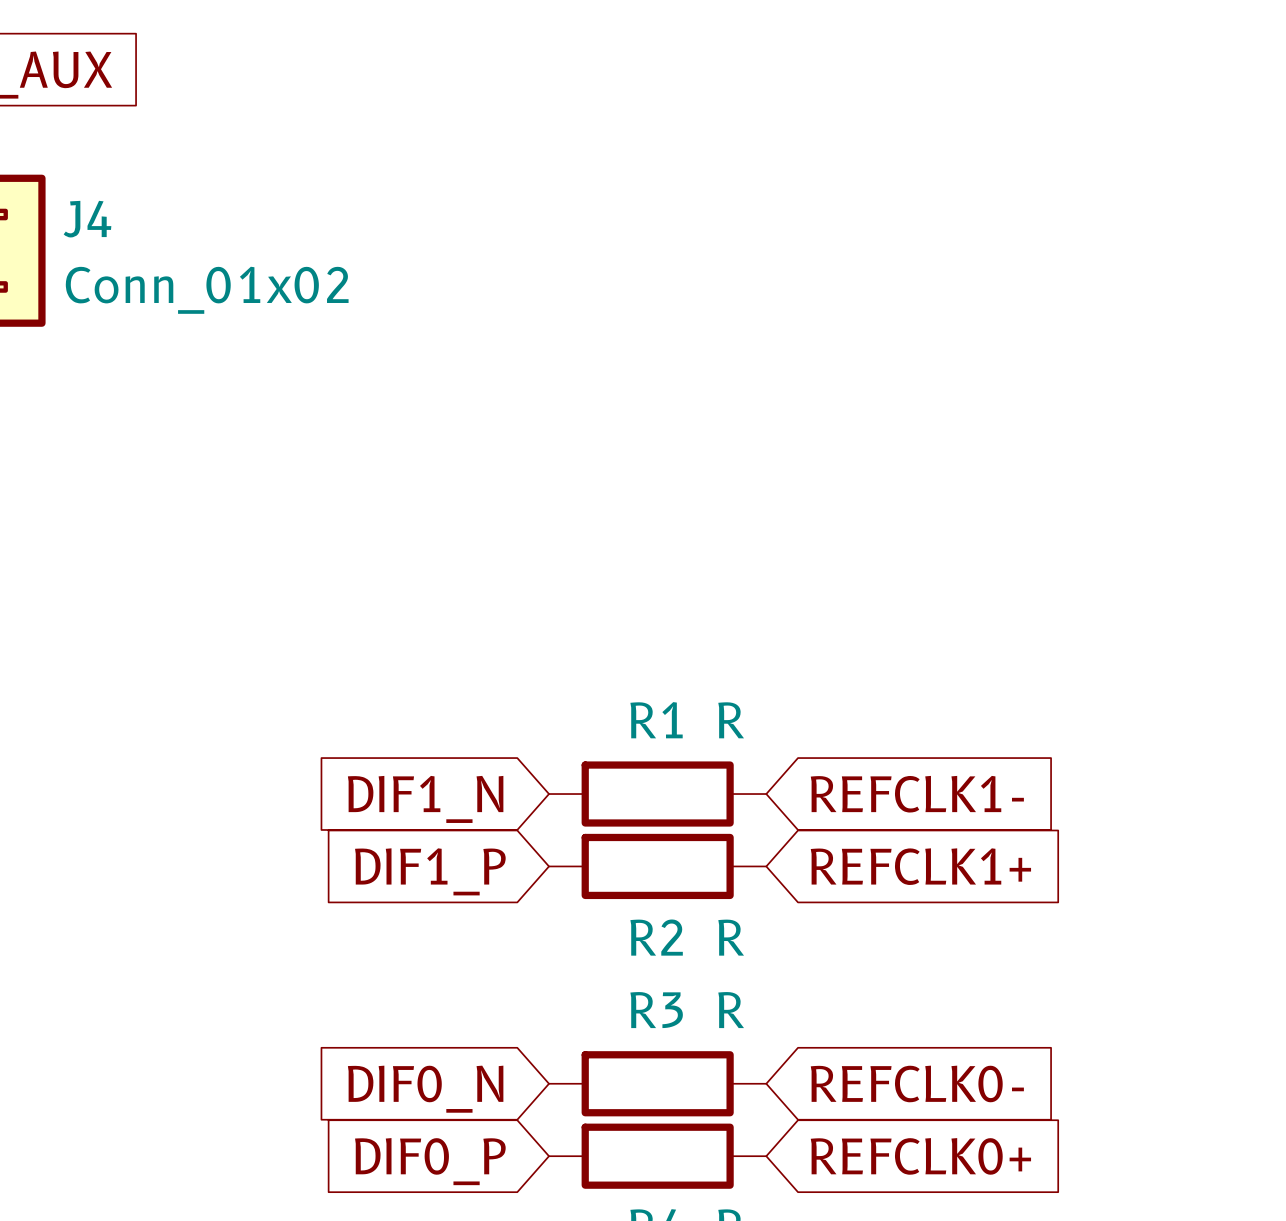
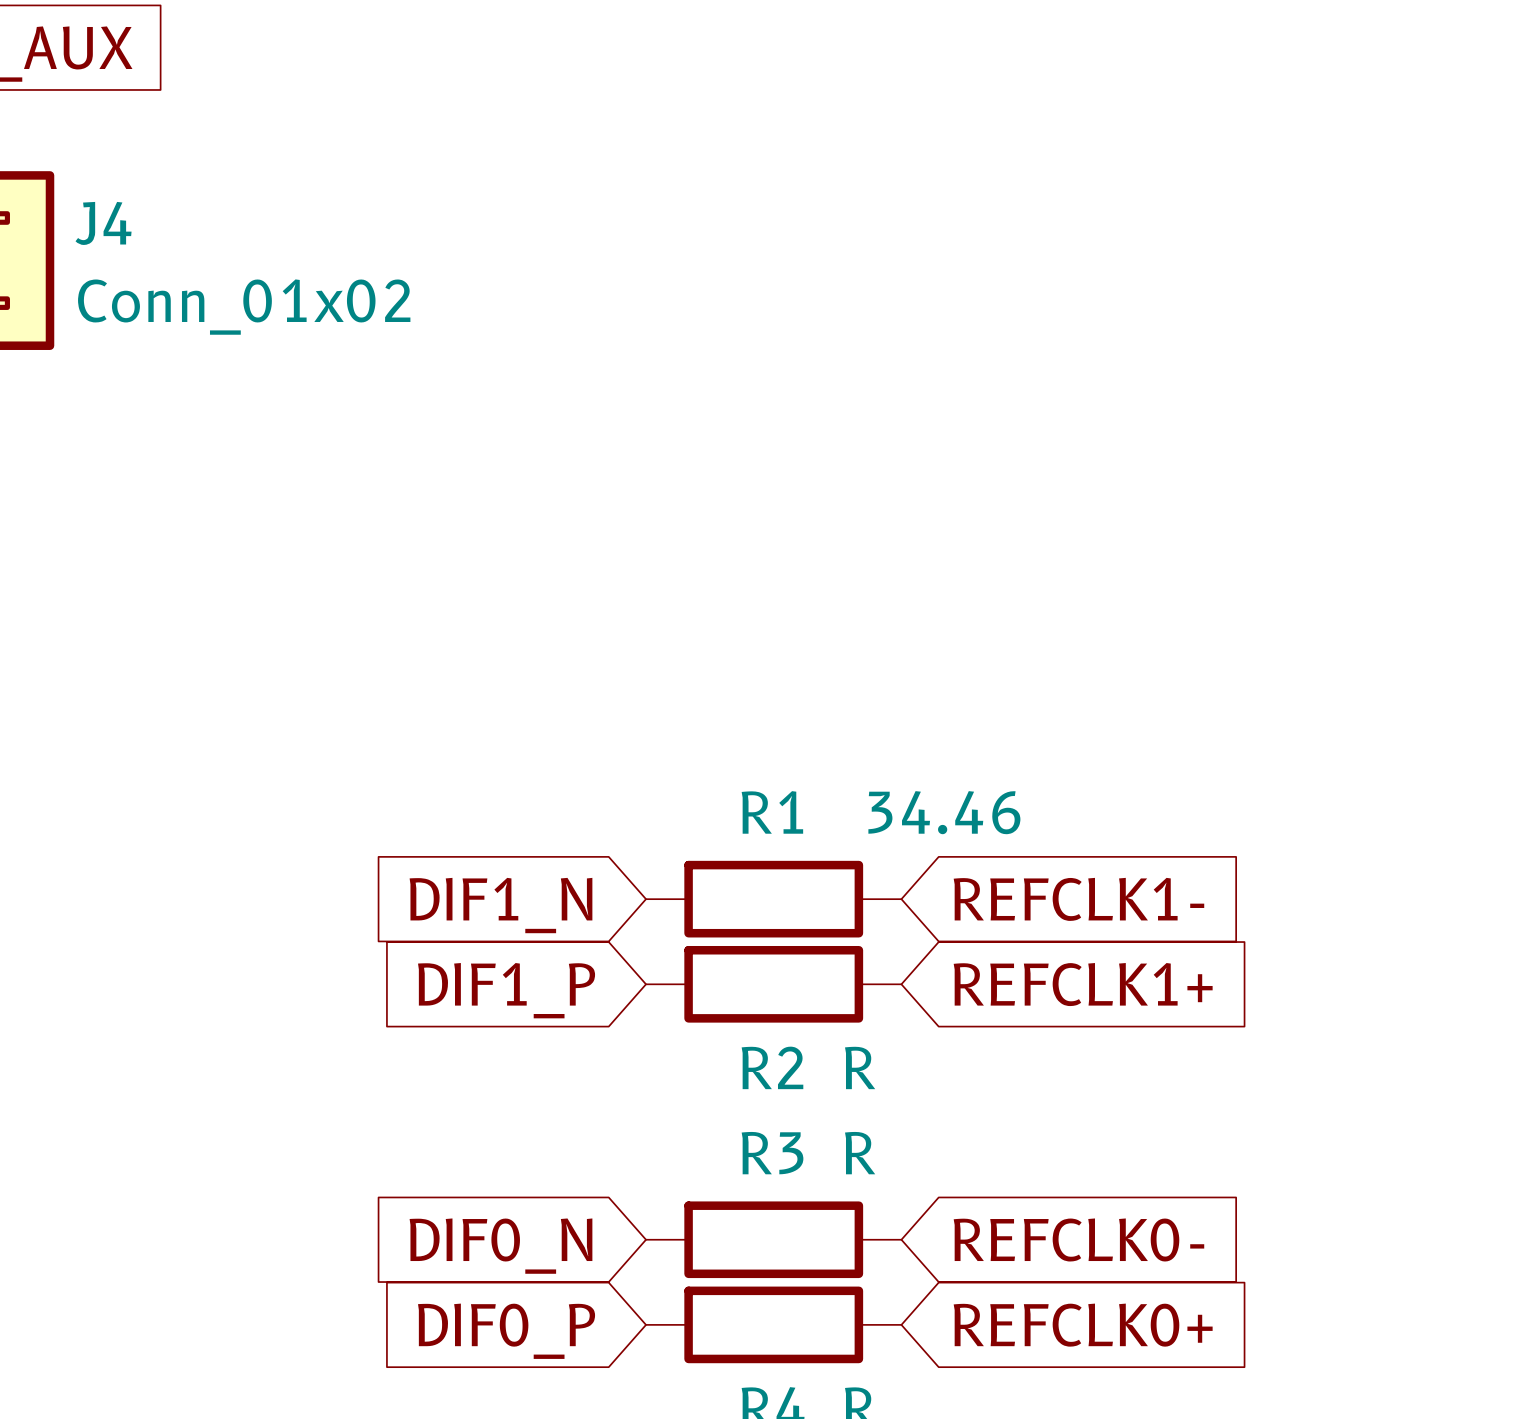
R1 value: R (731, 720) -> 34.46 (944, 812)

